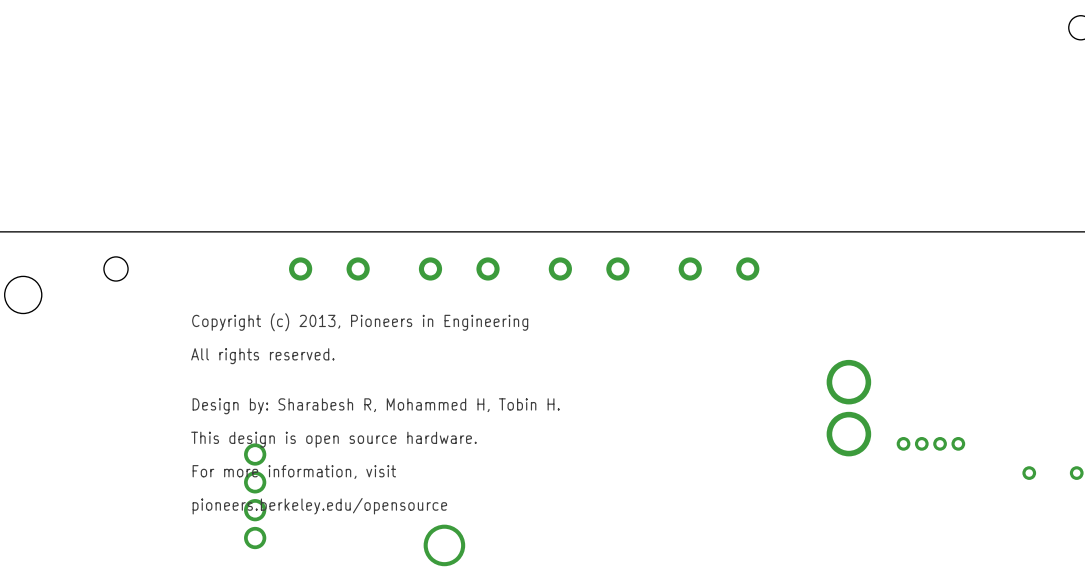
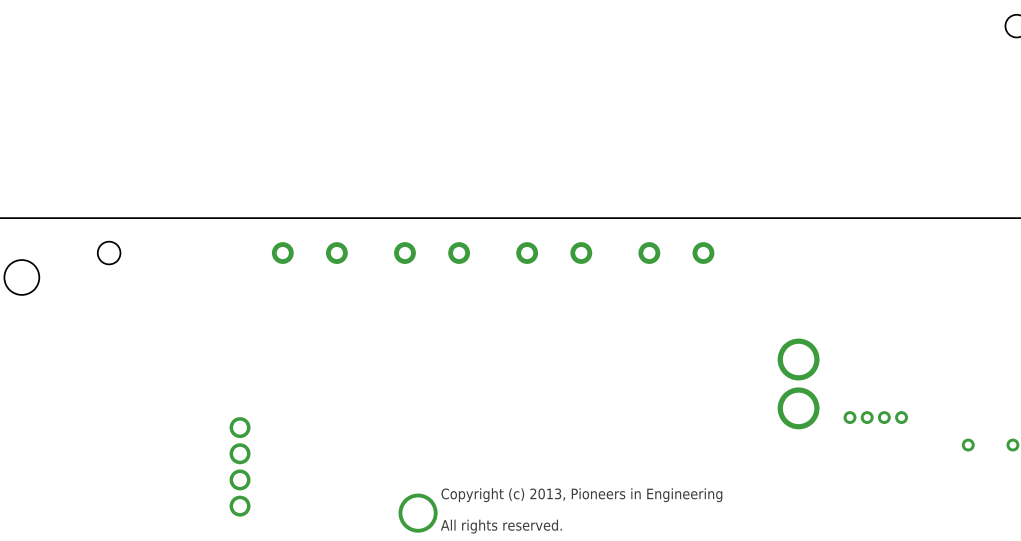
text: Copyright (c) 2013, Pioneers in Engineering (360, 322) -> none
text: All rights reserved. (262, 356) -> none
text: Design by: Sharabesh R, Mohammed H, Tobin H. (376, 406) -> none
text: This design is open source hardware. (333, 439) -> none
text: For more information, visit (294, 472) -> none
text: pioneers.berkeley.edu/opensource (319, 506) -> none
text: none -> Copyright (c) 2013, Pioneers in Engineering (581, 495)
text: none -> All rights reserved. (501, 526)

